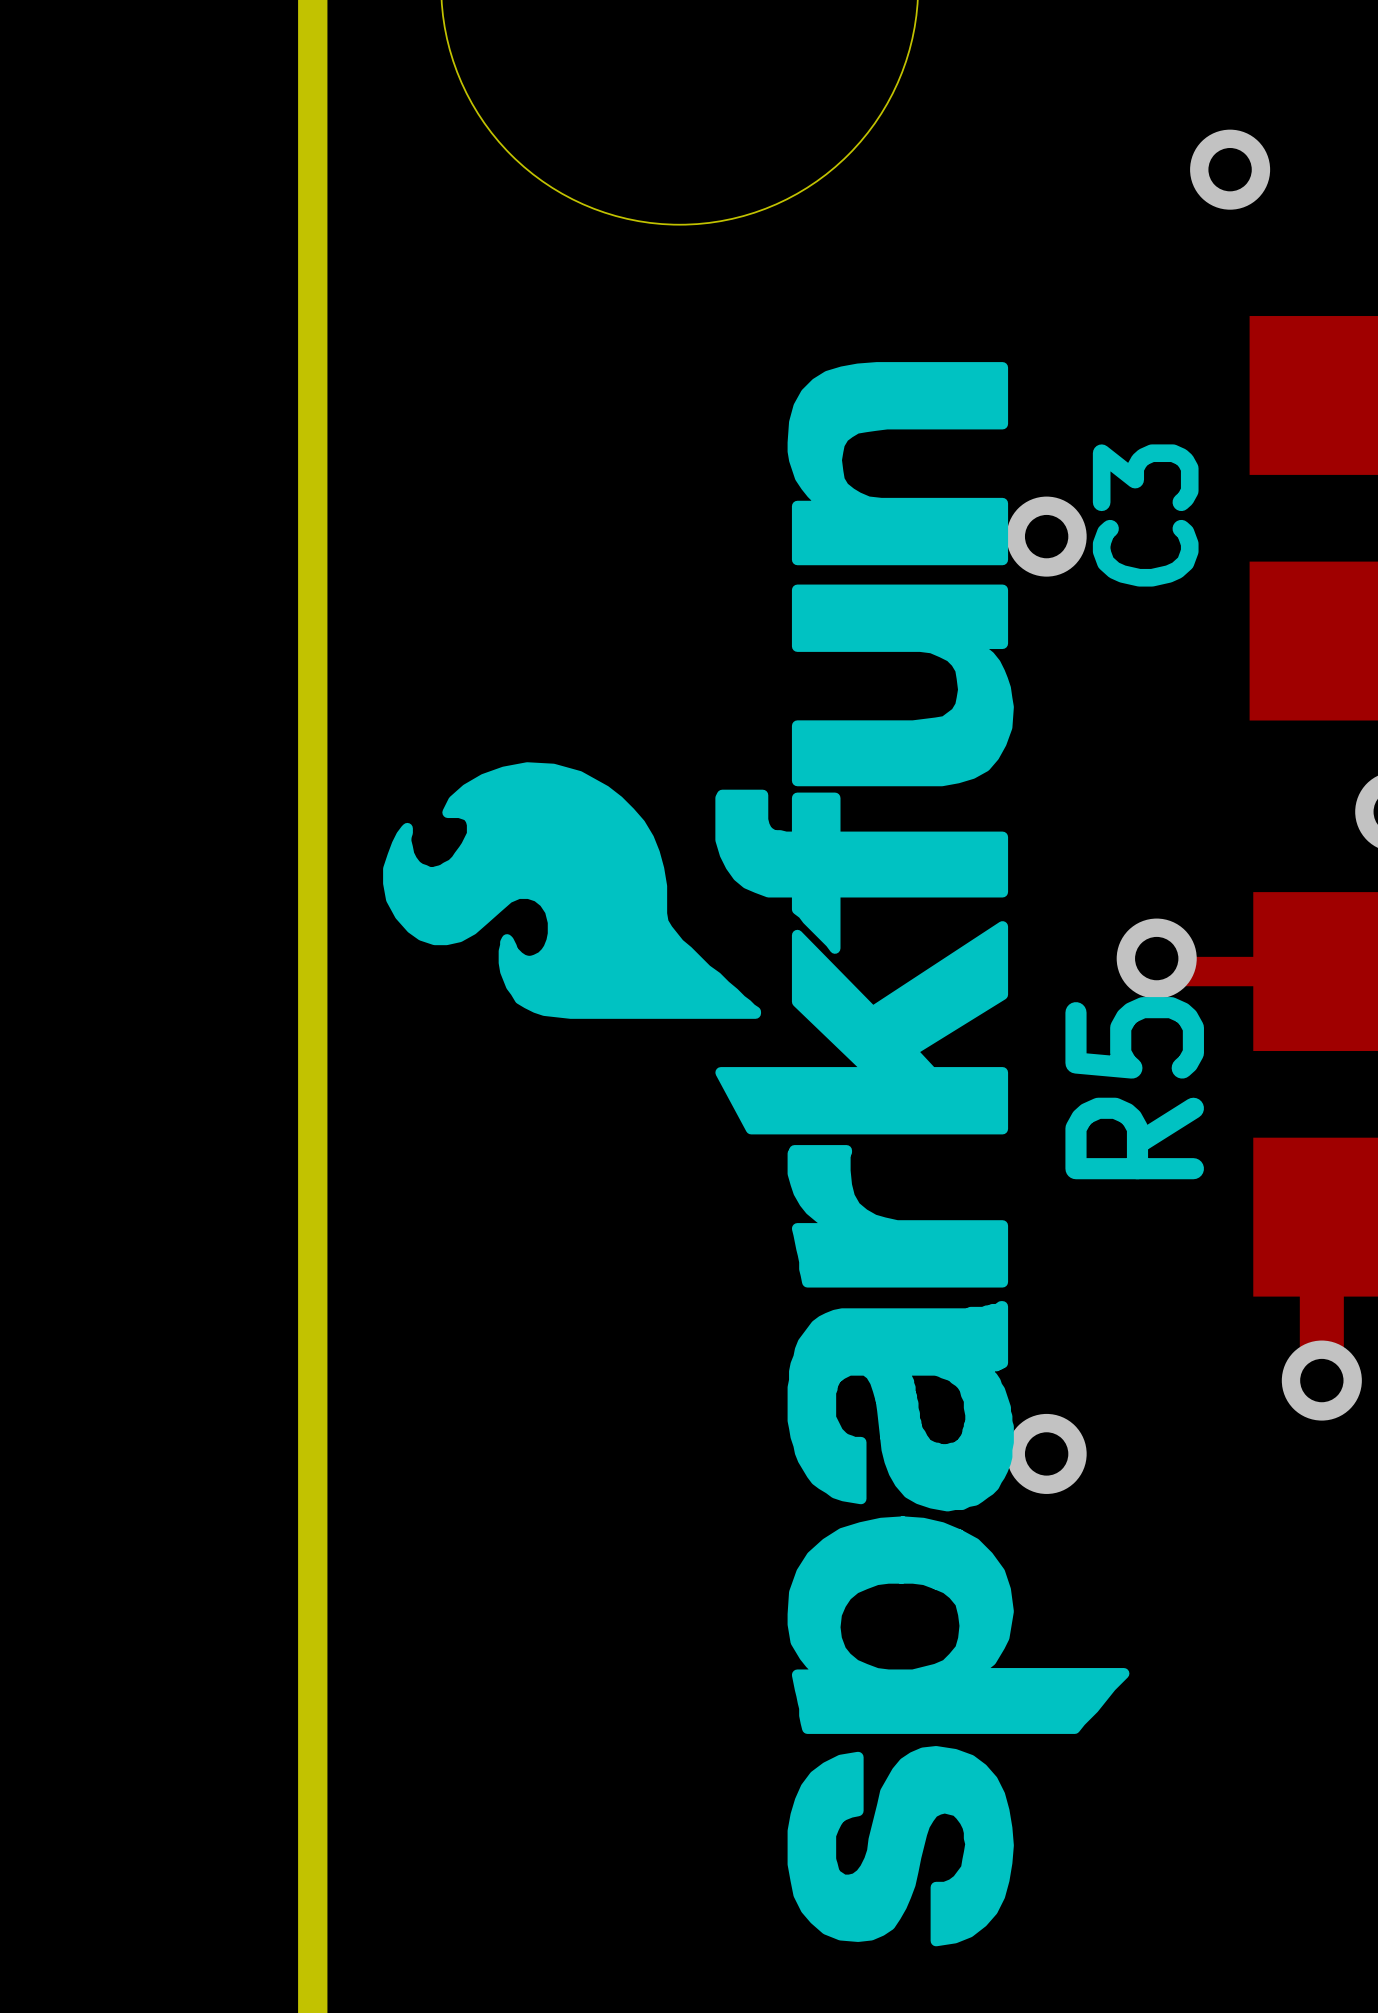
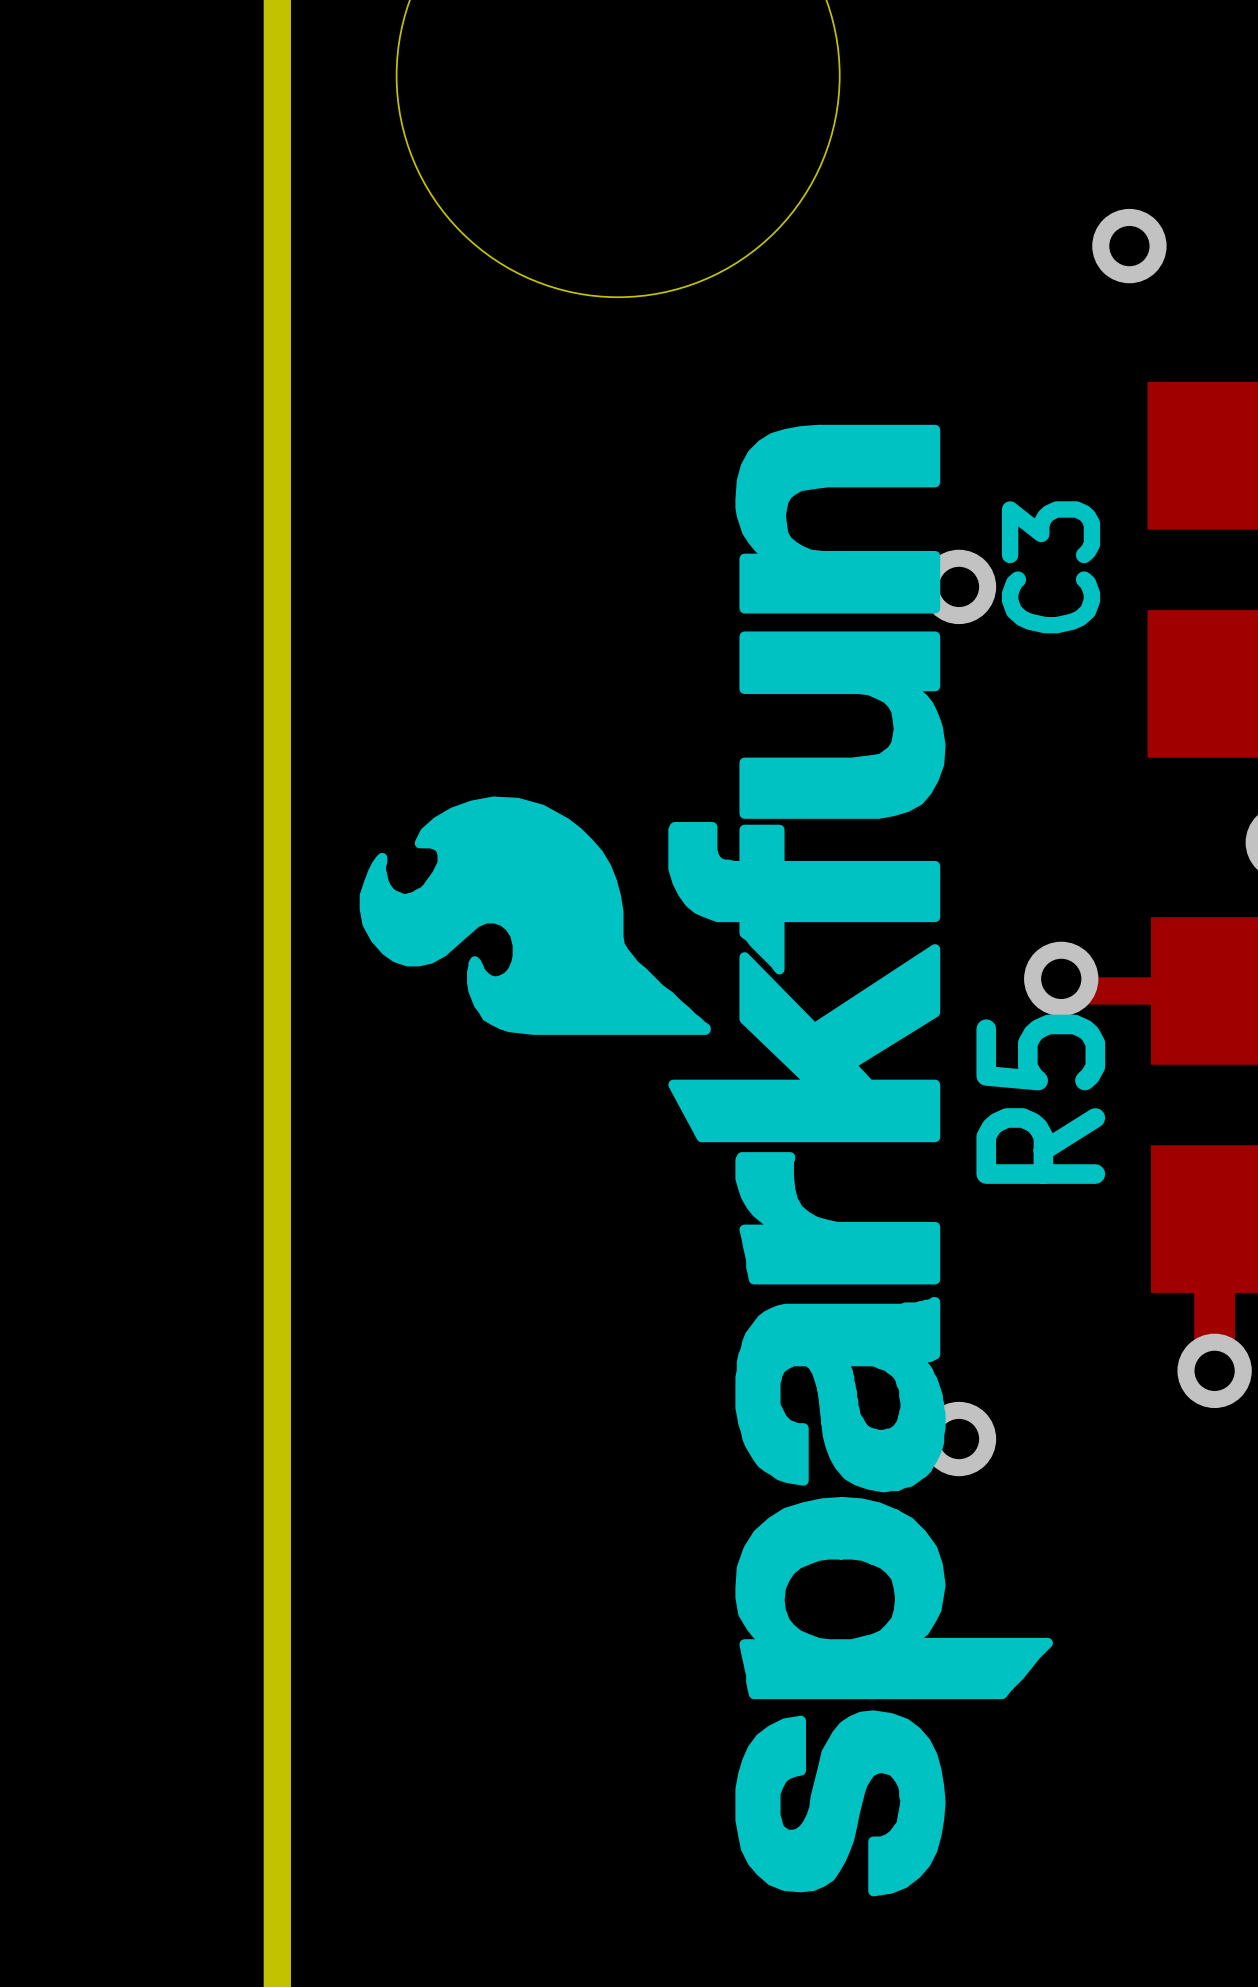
drawing position: (756, 1154) -> (706, 1160)

